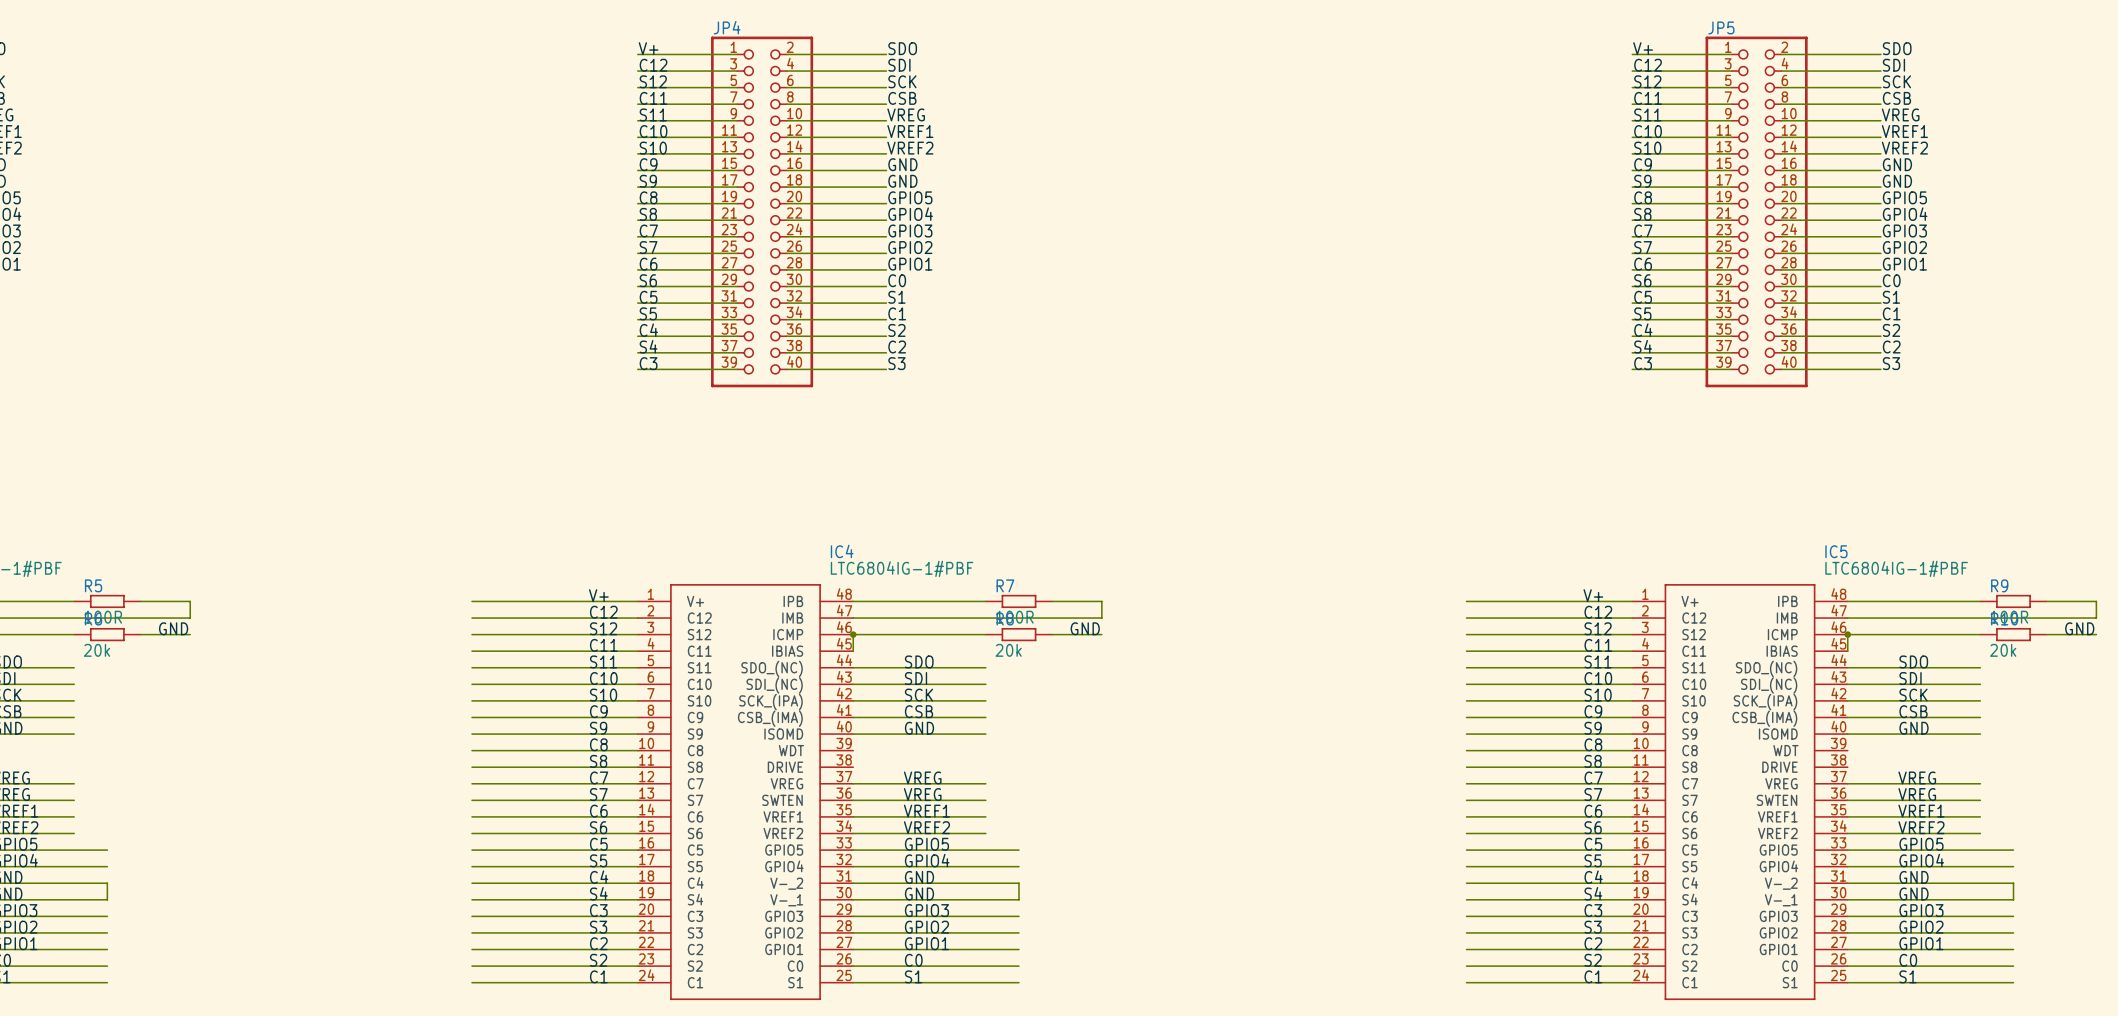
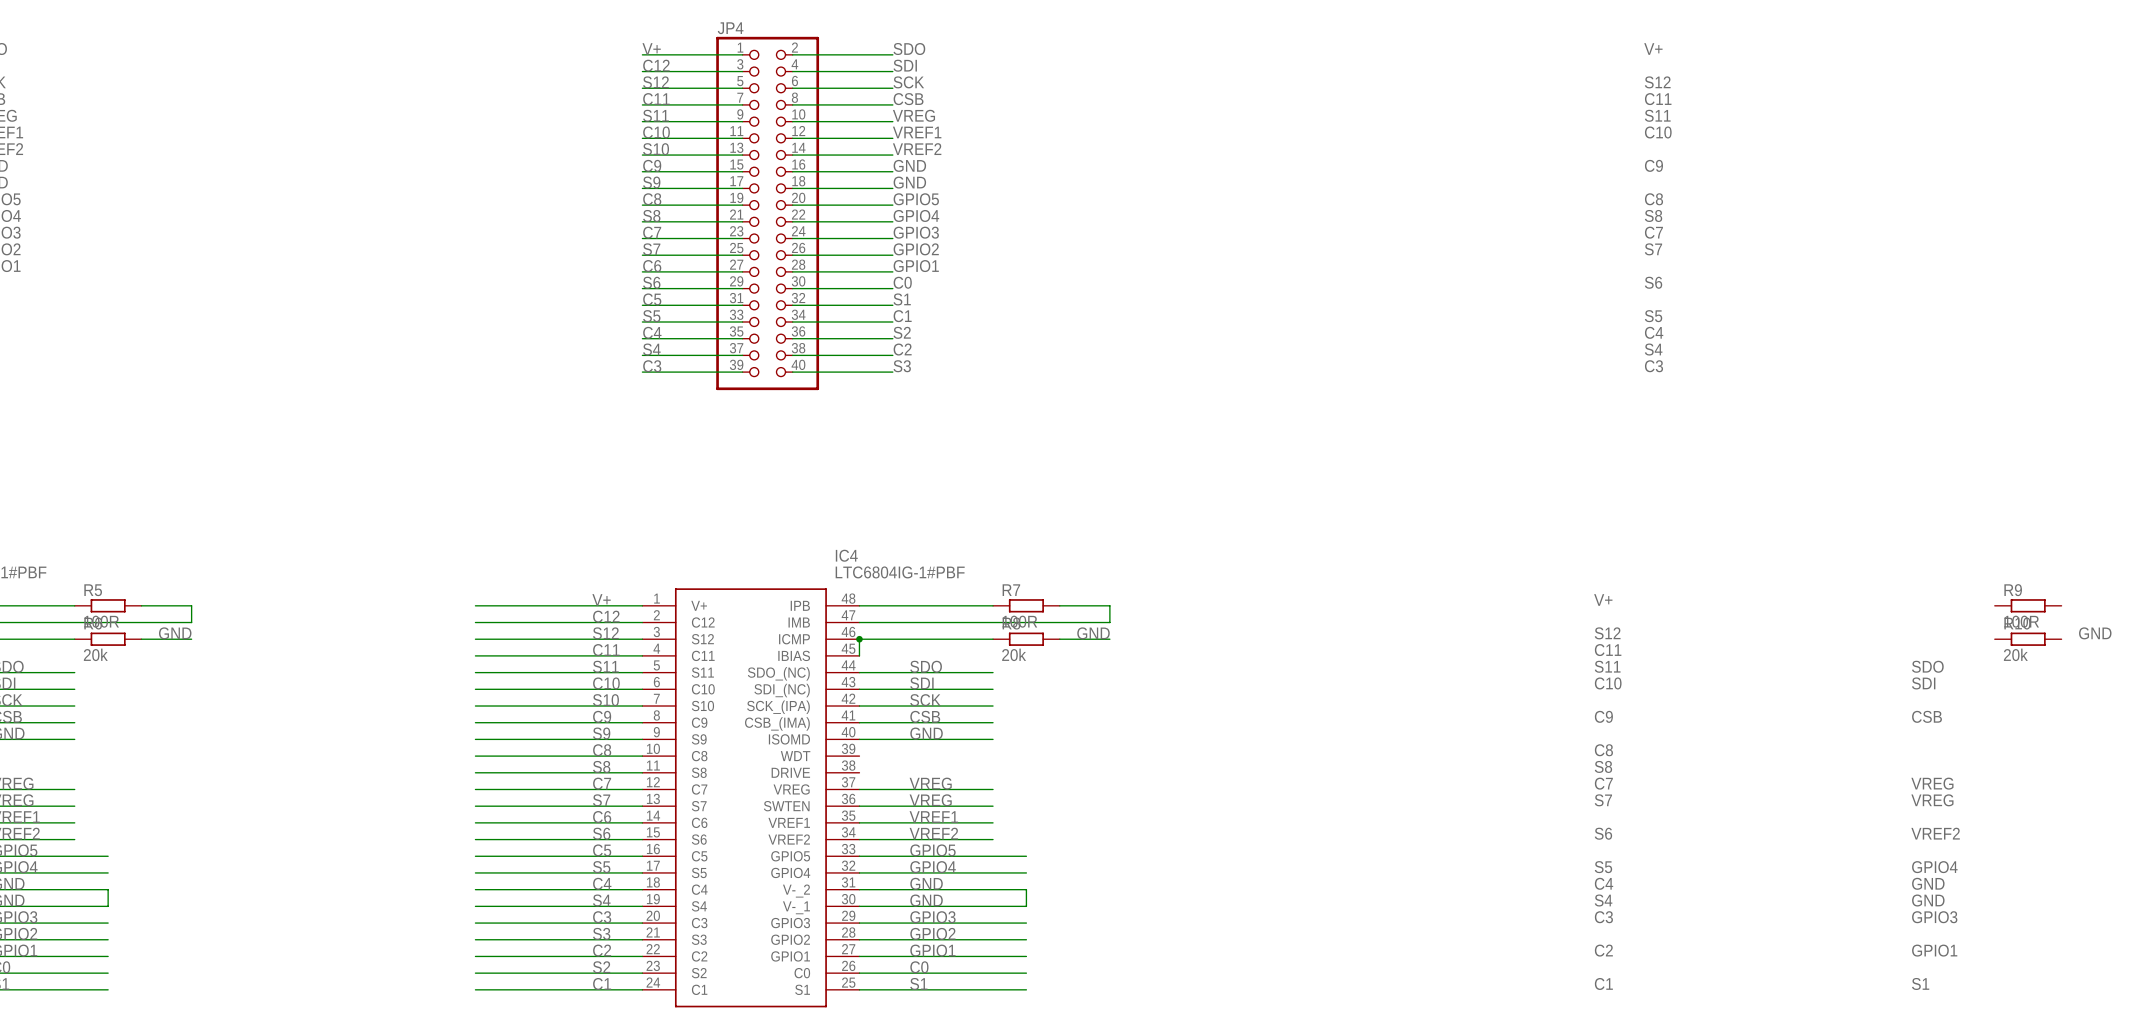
label: SDO (1897, 48) -> none
wire: (1632, 54) (1731, 54) -> none
wire: (1781, 54) (1880, 54) -> none
label: C12 (1648, 65) -> none
label: SDI (1893, 65) -> none
wire: (1632, 71) (1731, 71) -> none
wire: (1781, 71) (1880, 71) -> none
label: SCK (1896, 81) -> none
wire: (1632, 87) (1731, 87) -> none
wire: (1781, 87) (1880, 87) -> none
label: CSB (1896, 98) -> none
wire: (1632, 104) (1731, 104) -> none
wire: (1781, 104) (1880, 104) -> none
label: VREG (1900, 114) -> none
wire: (1632, 120) (1731, 120) -> none
wire: (1781, 120) (1880, 120) -> none
label: VREF1 (1904, 131) -> none
wire: (1632, 137) (1731, 137) -> none
wire: (1781, 137) (1880, 137) -> none
label: S10 (1647, 148) -> none
label: VREF2 (1904, 148) -> none
wire: (1632, 153) (1731, 153) -> none
wire: (1781, 153) (1880, 153) -> none
label: GND (1897, 164) -> none
wire: (1632, 170) (1731, 170) -> none
wire: (1781, 170) (1880, 170) -> none
label: S9 (1642, 181) -> none
label: GND (1897, 181) -> none
wire: (1632, 187) (1731, 187) -> none
wire: (1781, 187) (1880, 187) -> none
label: GPIO5 (1904, 197) -> none
wire: (1632, 203) (1731, 203) -> none
wire: (1781, 203) (1880, 203) -> none
JP5: (1756, 211) -> none
label: GPIO4 (1905, 214) -> none
wire: (1632, 220) (1731, 220) -> none
wire: (1781, 220) (1880, 220) -> none
label: GPIO3 (1904, 230) -> none
wire: (1632, 236) (1731, 236) -> none
wire: (1781, 236) (1880, 236) -> none
label: GPIO2 (1904, 247) -> none
wire: (1632, 253) (1731, 253) -> none
wire: (1781, 253) (1880, 253) -> none
label: C6 (1643, 264) -> none
label: GPIO1 (1904, 264) -> none
wire: (1632, 269) (1731, 269) -> none
wire: (1781, 269) (1880, 269) -> none
label: C0 (1891, 280) -> none
wire: (1632, 286) (1731, 286) -> none
wire: (1781, 286) (1880, 286) -> none
label: C5 (1643, 297) -> none
label: S1 (1891, 297) -> none
wire: (1632, 303) (1731, 303) -> none
wire: (1781, 303) (1880, 303) -> none
label: C1 (1891, 313) -> none
wire: (1632, 319) (1731, 319) -> none
wire: (1781, 319) (1880, 319) -> none
label: S2 (1891, 330) -> none
wire: (1632, 336) (1731, 336) -> none
wire: (1781, 336) (1880, 336) -> none
label: C2 (1891, 347) -> none
wire: (1632, 352) (1731, 352) -> none
wire: (1781, 352) (1880, 352) -> none
label: S3 (1891, 363) -> none
wire: (1632, 369) (1731, 369) -> none
wire: (1781, 369) (1880, 369) -> none
wire: (1466, 601) (1632, 601) -> none
wire: (1847, 601) (1980, 601) -> none
wire: (2046, 601) (2096, 601) (2096, 618) (1847, 618) -> none
label: C12 (1598, 612) -> none
wire: (1466, 618) (1632, 618) -> none
wire: (1466, 634) (1632, 634) -> none
junction: (1847, 634) -> none
wire: (1980, 634) (1847, 634) (1847, 651) -> none
wire: (2046, 634) (2096, 634) -> none
wire: (1466, 651) (1632, 651) -> none
wire: (1466, 667) (1632, 667) -> none
wire: (1847, 667) (1980, 667) -> none
wire: (1466, 684) (1632, 684) -> none
wire: (1847, 684) (1980, 684) -> none
label: S10 (1598, 695) -> none
label: SCK (1913, 695) -> none
wire: (1466, 700) (1632, 700) -> none
wire: (1847, 700) (1980, 700) -> none
wire: (1466, 717) (1632, 717) -> none
wire: (1847, 717) (1980, 717) -> none
label: S9 (1593, 728) -> none
label: GND (1914, 728) -> none
wire: (1466, 734) (1632, 734) -> none
wire: (1847, 734) (1980, 734) -> none
wire: (1466, 750) (1632, 750) -> none
wire: (1466, 767) (1632, 767) -> none
wire: (1466, 783) (1632, 783) -> none
wire: (1847, 783) (1980, 783) -> none
IC5: LTC6804IG-1#PBF (1740, 792) -> none
wire: (1466, 800) (1632, 800) -> none
wire: (1847, 800) (1980, 800) -> none
label: C6 (1593, 811) -> none
label: VREF1 (1921, 811) -> none
wire: (1466, 816) (1632, 816) -> none
wire: (1847, 816) (1980, 816) -> none
wire: (1466, 833) (1632, 833) -> none
wire: (1847, 833) (1980, 833) -> none
label: C5 (1593, 844) -> none
label: GPIO5 (1921, 844) -> none
wire: (1466, 850) (1632, 850) -> none
wire: (1847, 850) (2013, 850) -> none
wire: (1466, 866) (1632, 866) -> none
wire: (1847, 866) (2013, 866) -> none
wire: (1466, 883) (1632, 883) -> none
wire: (1847, 883) (2013, 883) (2013, 899) (1847, 899) -> none
wire: (1466, 899) (1632, 899) -> none
wire: (1466, 916) (1632, 916) -> none
wire: (1847, 916) (2013, 916) -> none
label: S3 (1593, 927) -> none
label: GPIO2 (1921, 927) -> none
wire: (1466, 932) (1632, 932) -> none
wire: (1847, 932) (2013, 932) -> none
wire: (1466, 949) (1632, 949) -> none
wire: (1847, 949) (2013, 949) -> none
label: S2 (1593, 960) -> none
label: C0 (1908, 960) -> none
wire: (1466, 966) (1632, 966) -> none
wire: (1847, 966) (2013, 966) -> none
wire: (1466, 982) (1632, 982) -> none
wire: (1847, 982) (2013, 982) -> none

